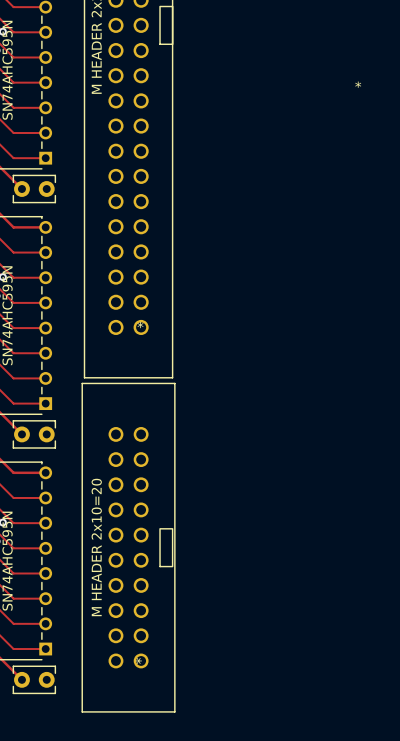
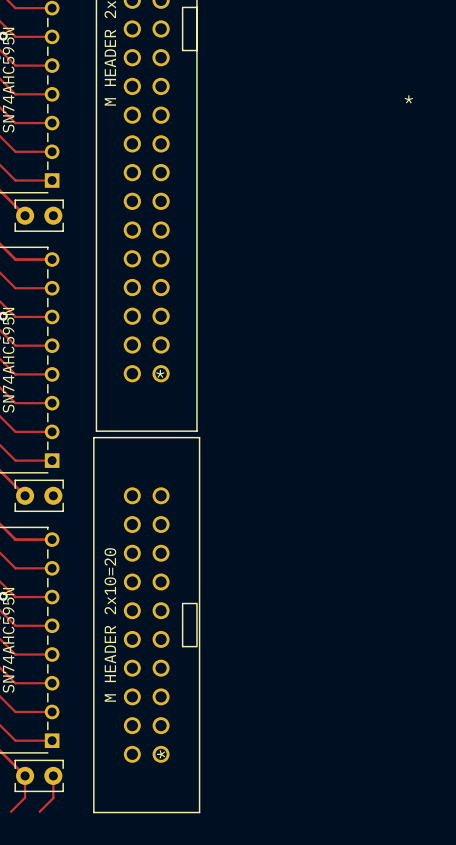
track: none -> (25, 777) (25, 797) (10, 811)
track: none -> (53, 777) (53, 798) (39, 811)

